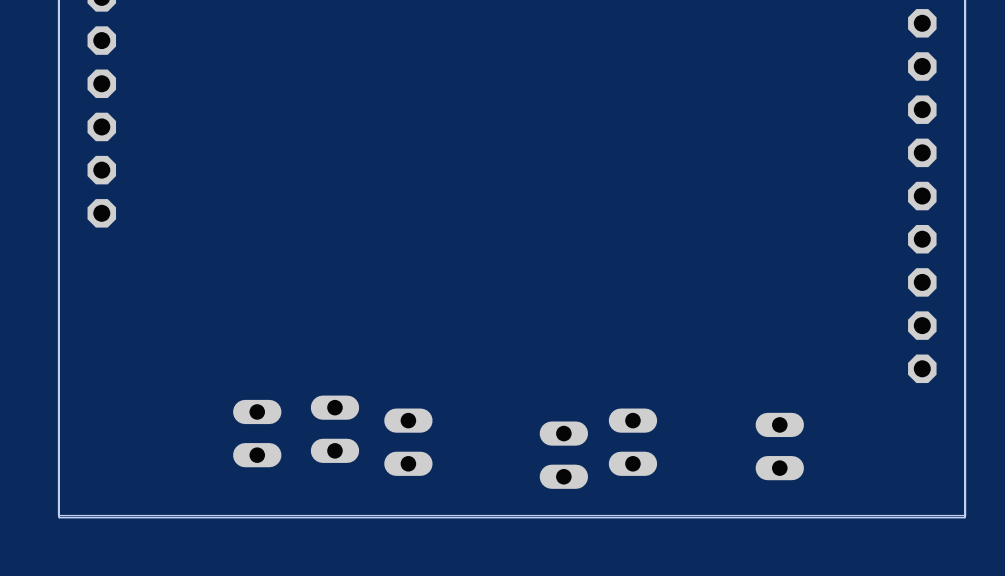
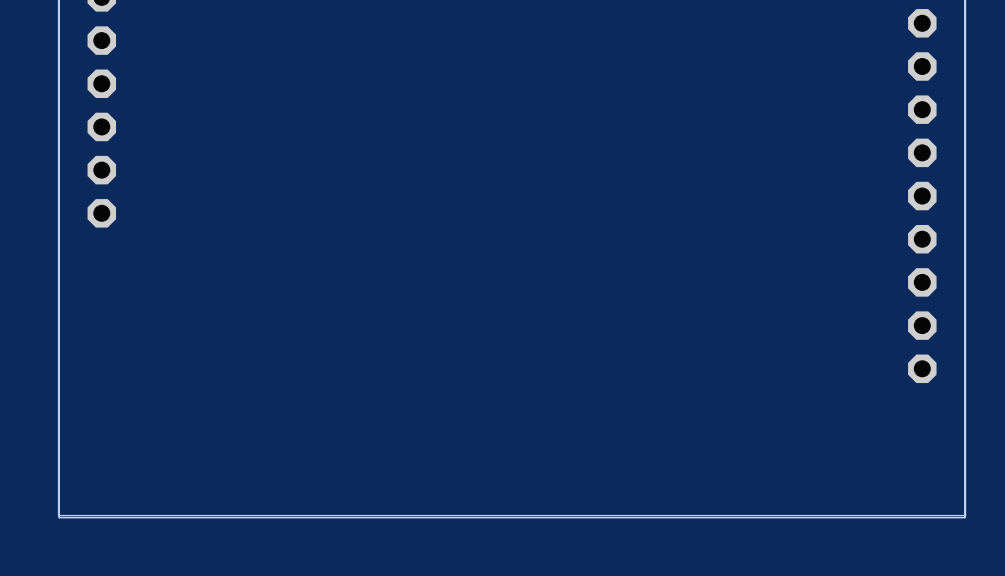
part: (334, 429) -> none
part: (257, 433) -> none
part: (408, 442) -> none
part: (632, 442) -> none
part: (779, 446) -> none
part: (563, 455) -> none

